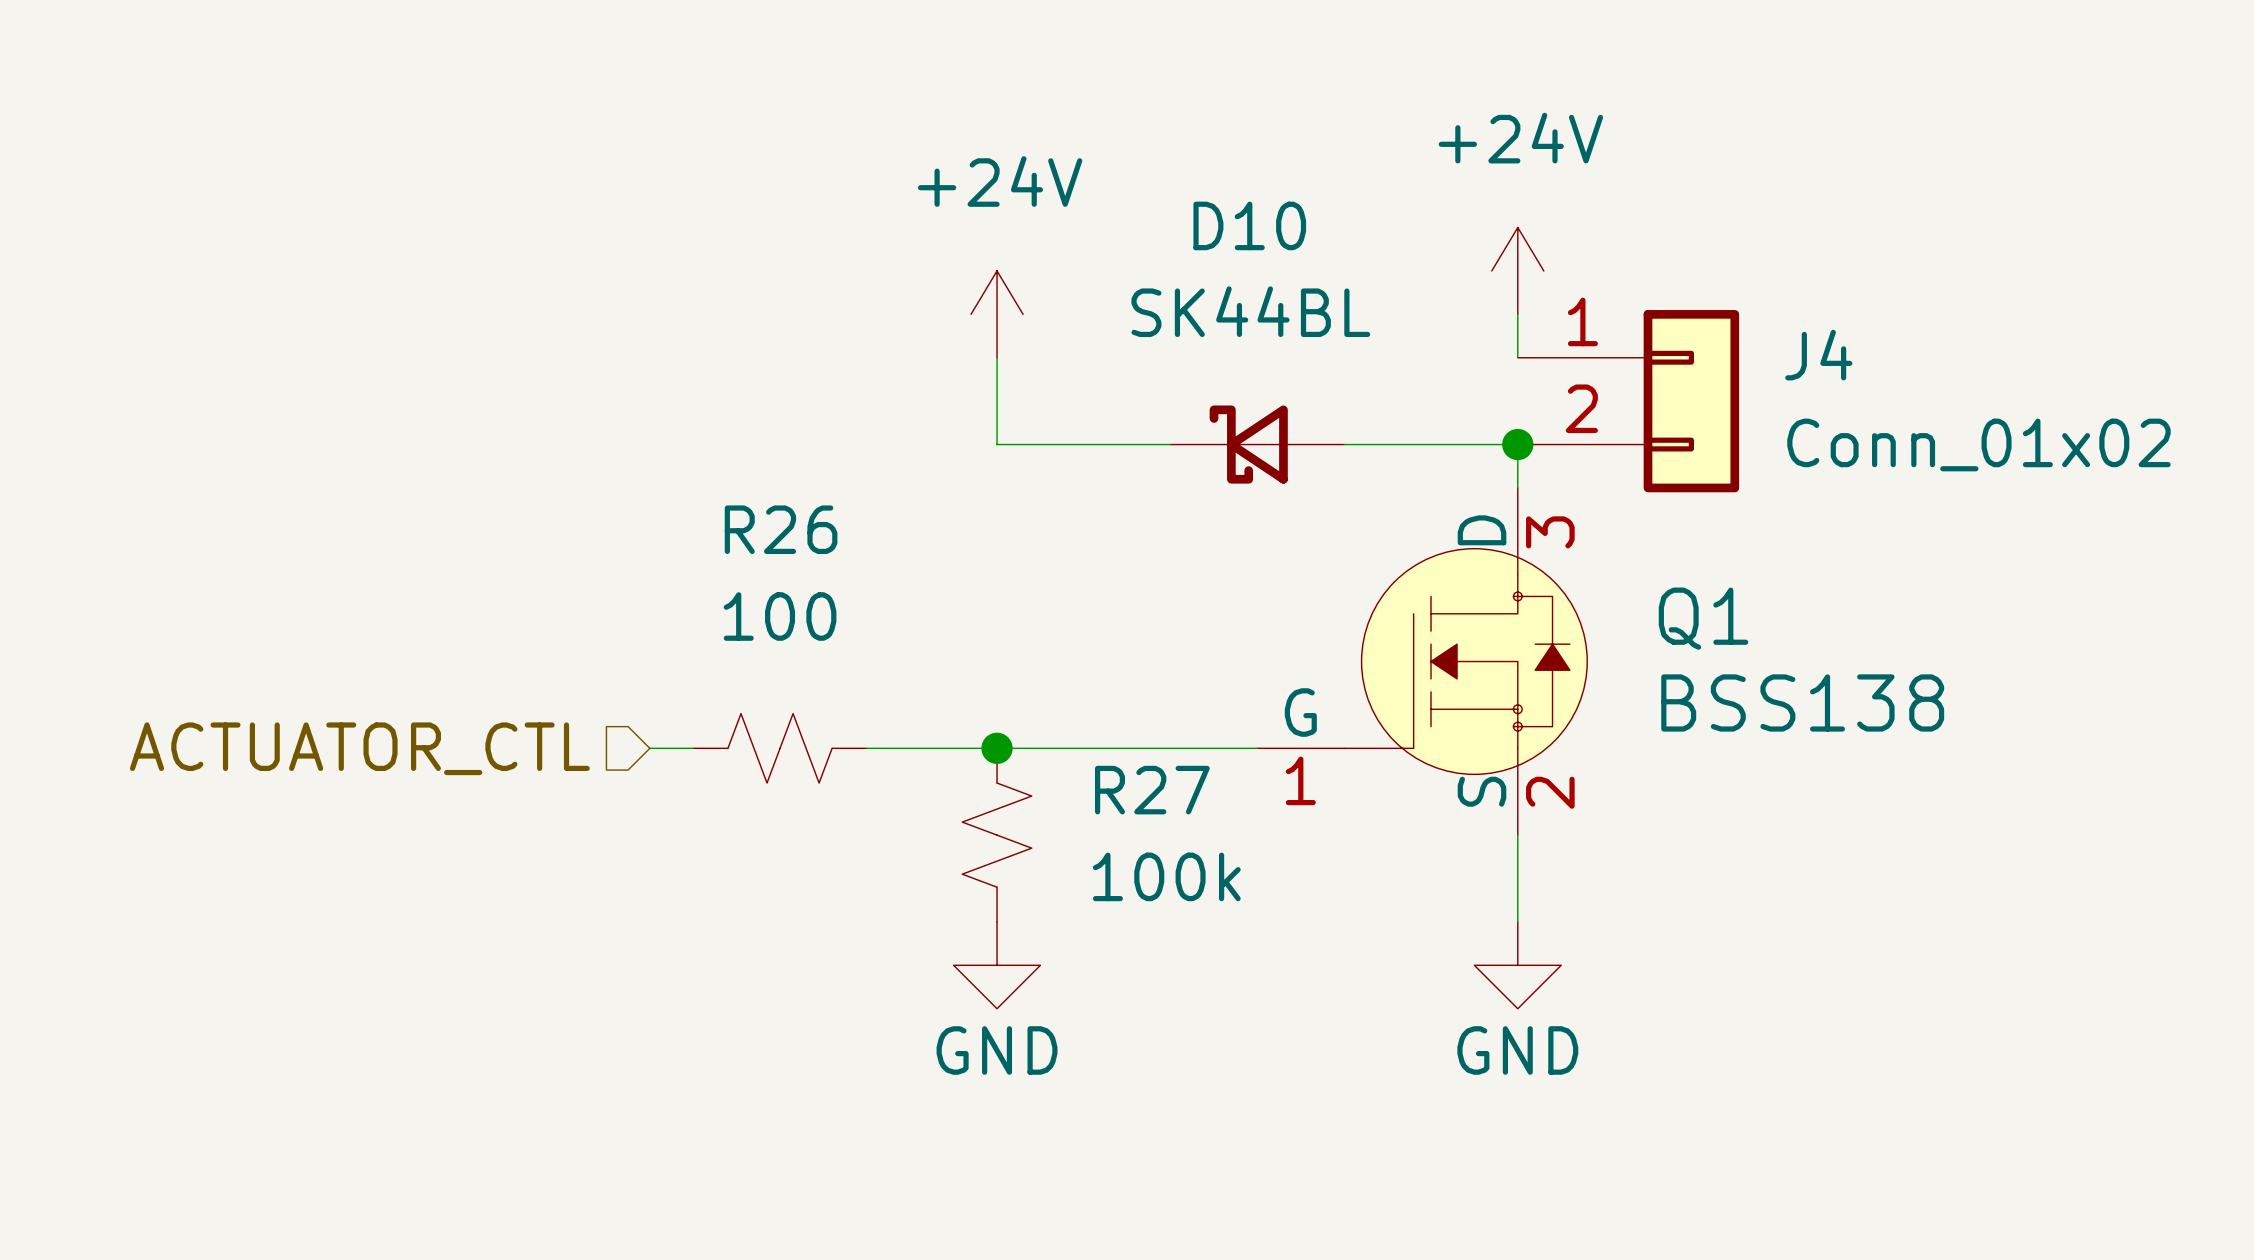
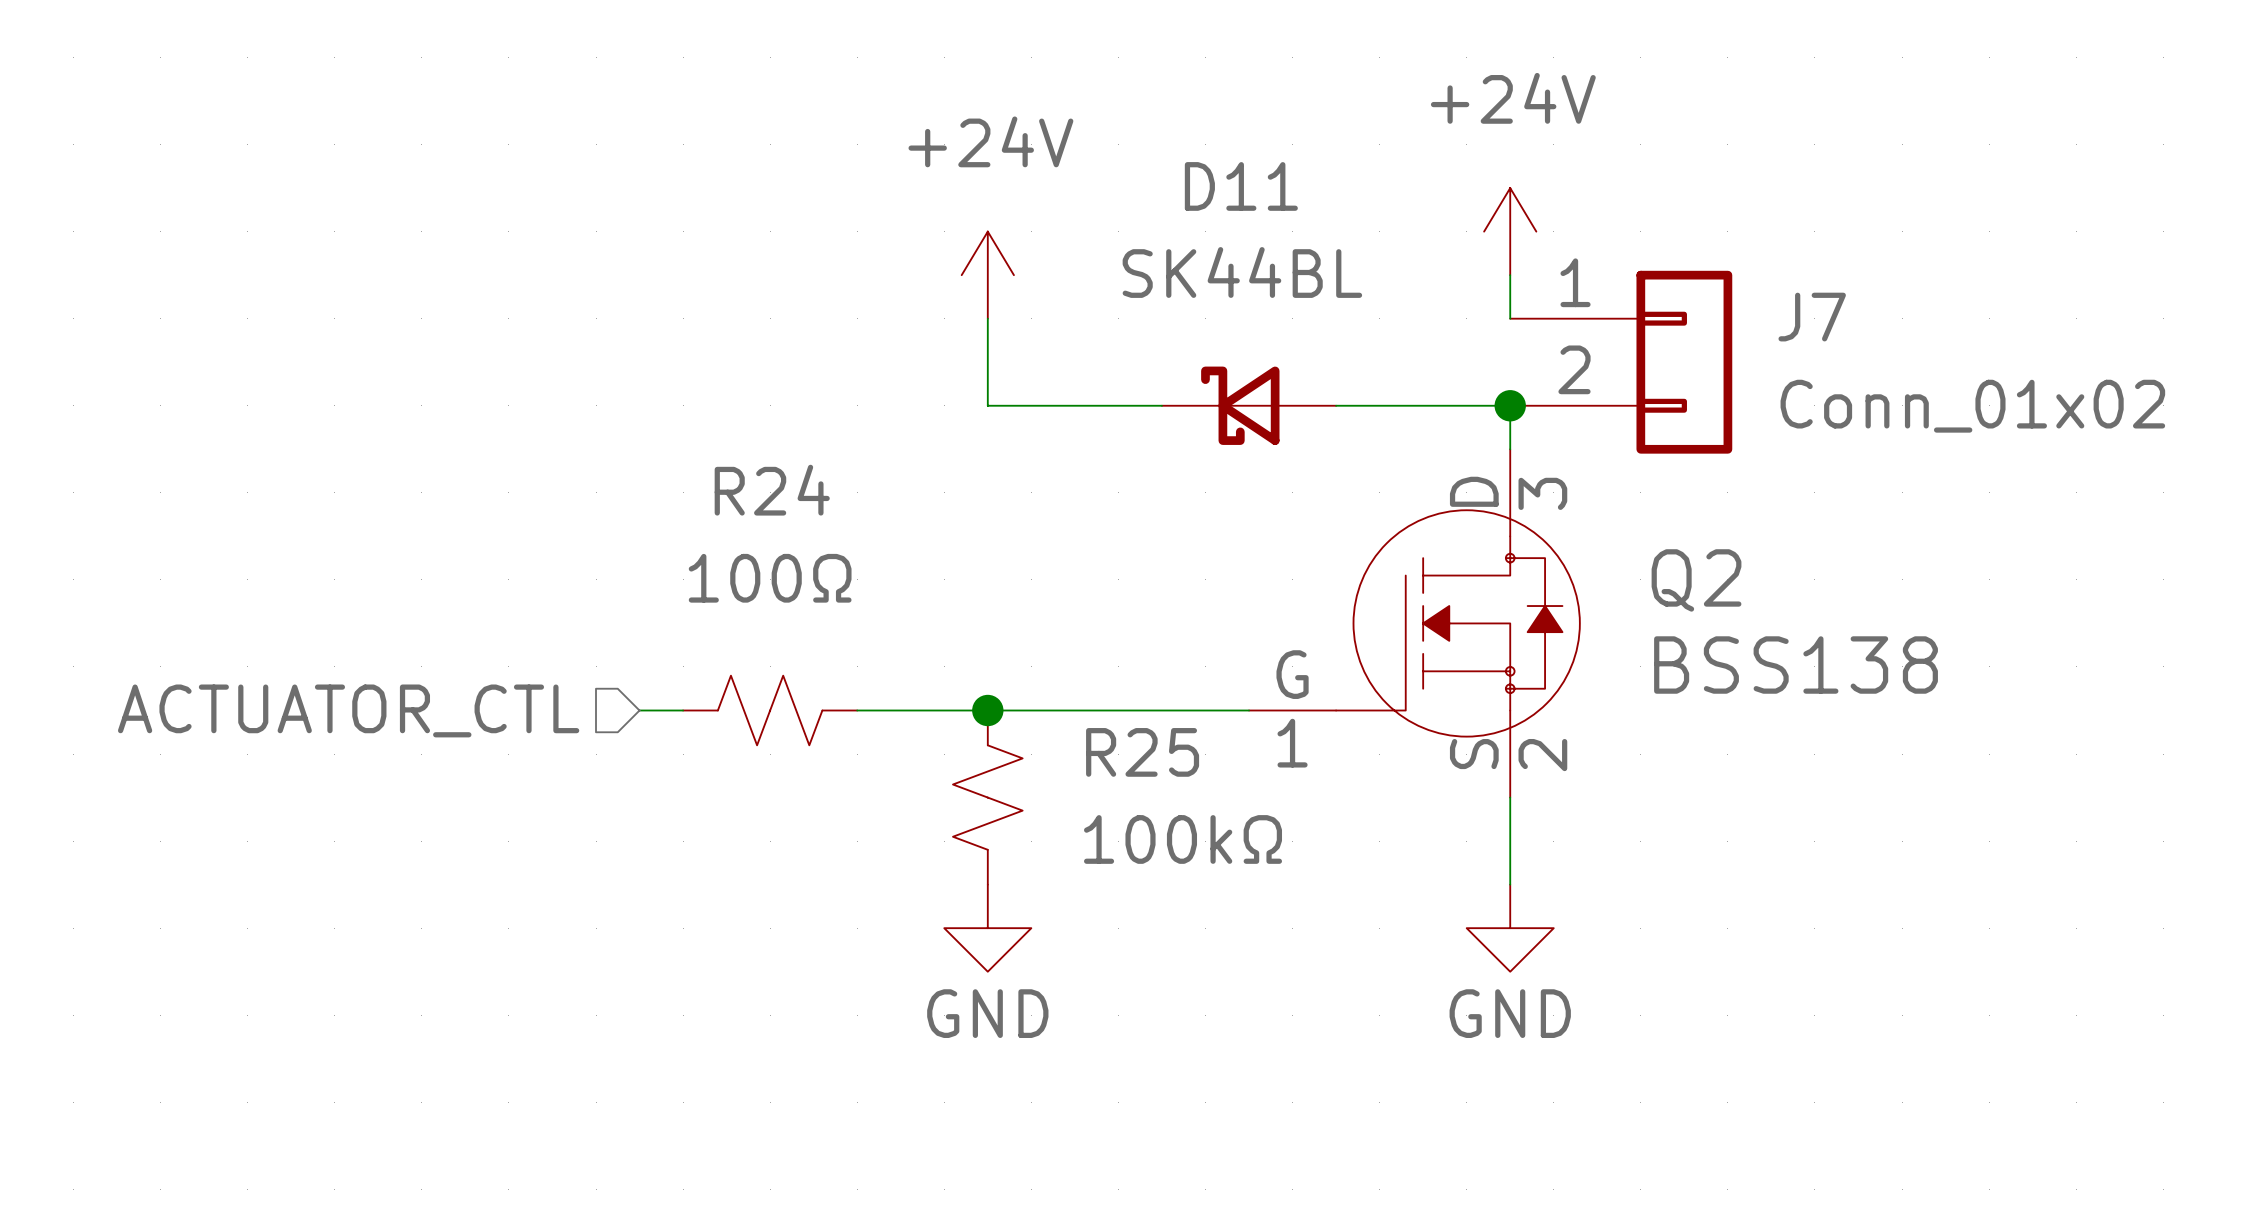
D10 name: D10 (1249, 225) -> D11 (1241, 186)
J4 name: J4 (1818, 355) -> J7 (1812, 317)
R26 name: R26 (781, 529) -> R24 (772, 490)
R26 value: 100 (780, 616) -> 100Ω (770, 578)
Q1 name: Q1 (1703, 618) -> Q2 (1696, 580)
R27 name: R27 (1152, 790) -> R25 (1142, 752)
R27 value: 100k (1166, 876) -> 100kΩ (1183, 839)

